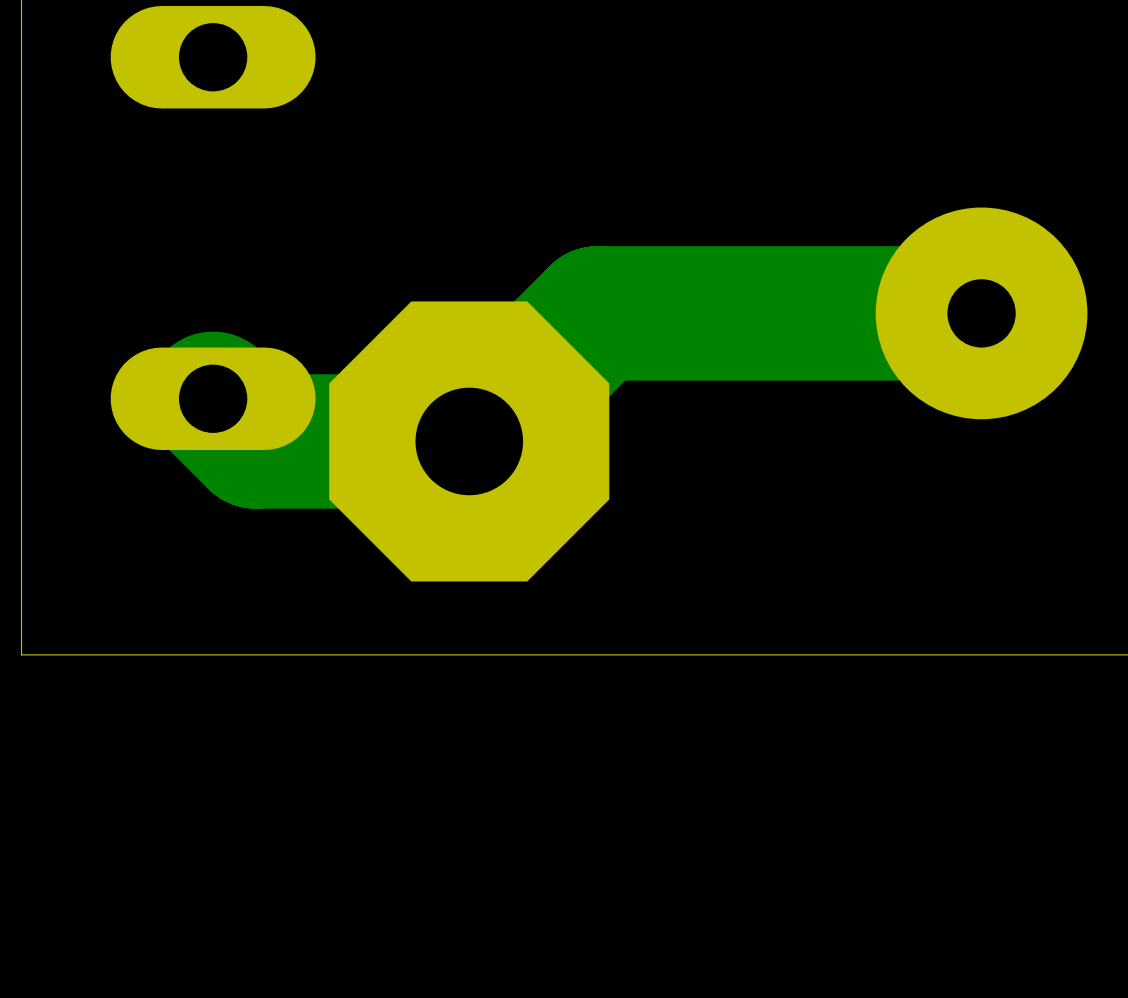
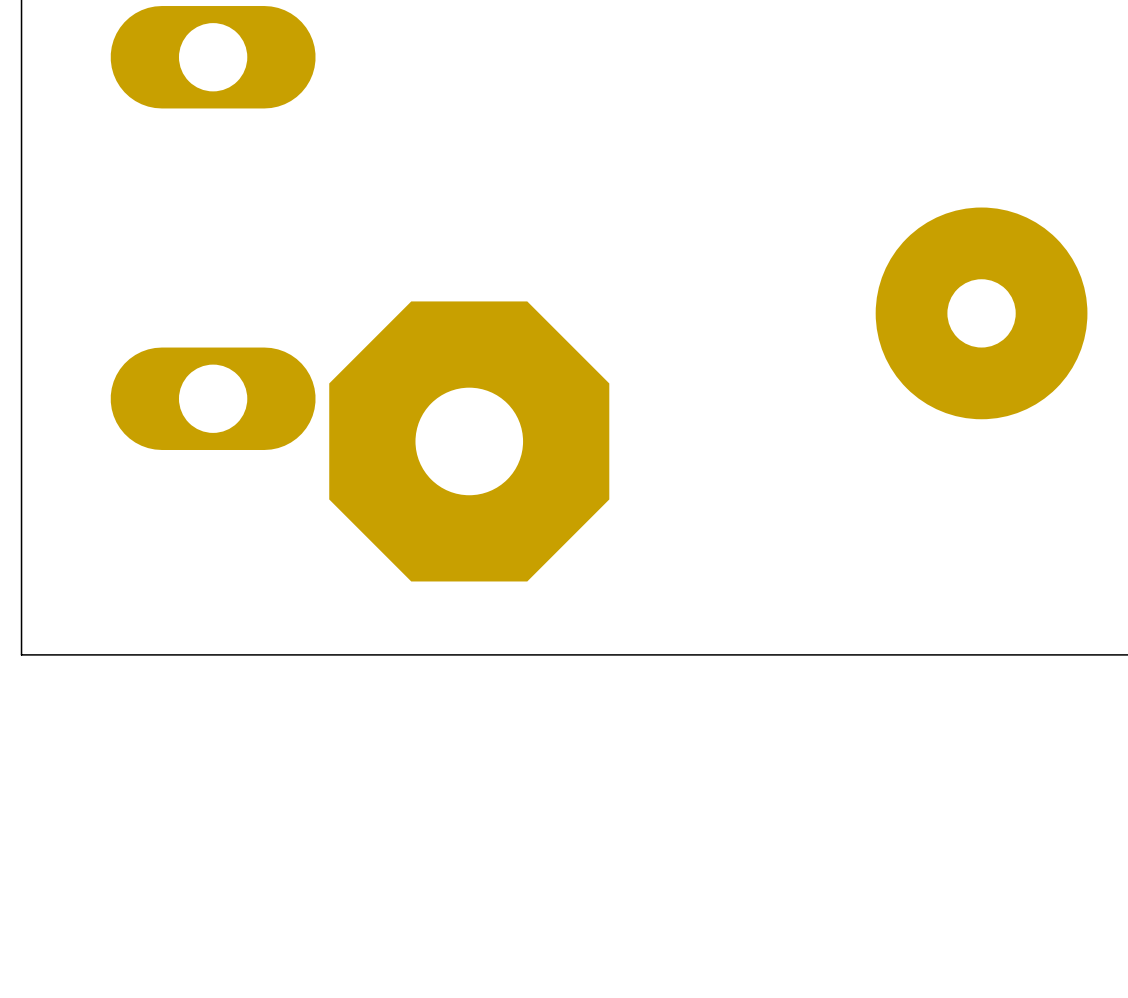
track: (981, 313) (597, 313) (469, 441) (255, 441) (213, 398) -> none

